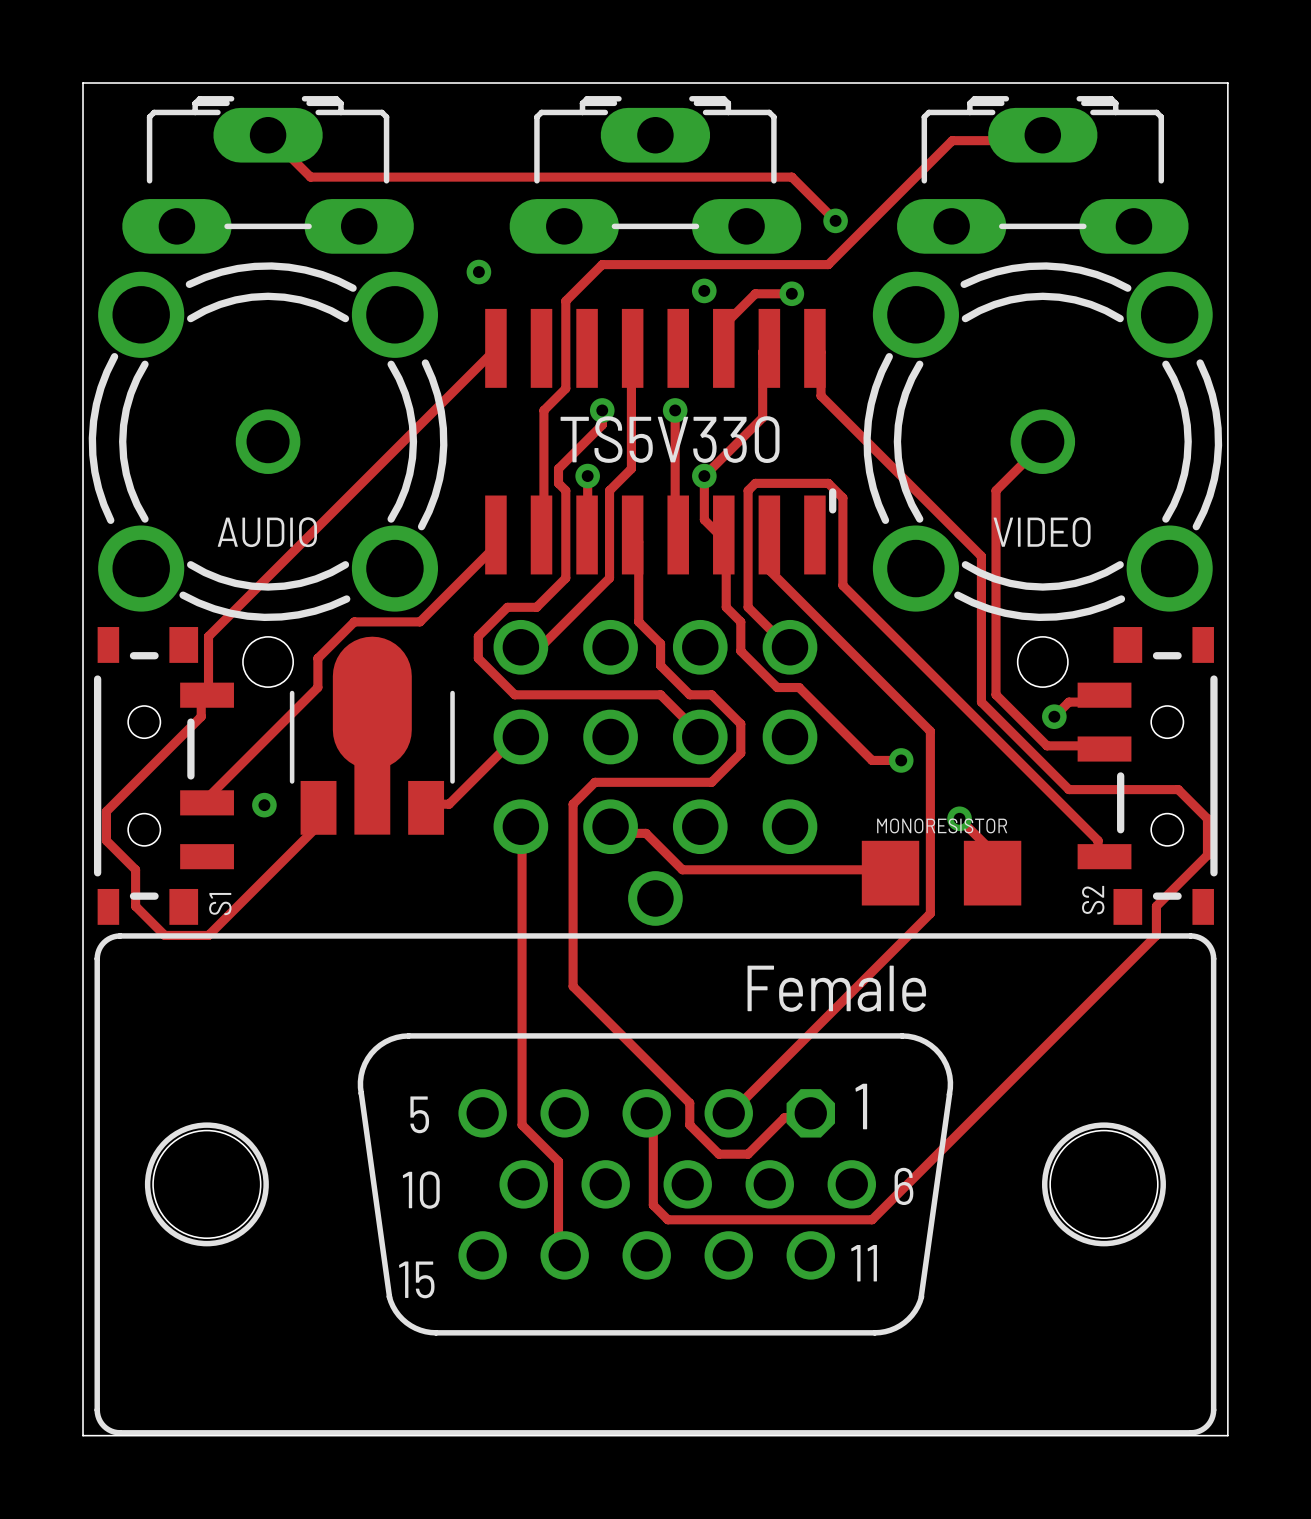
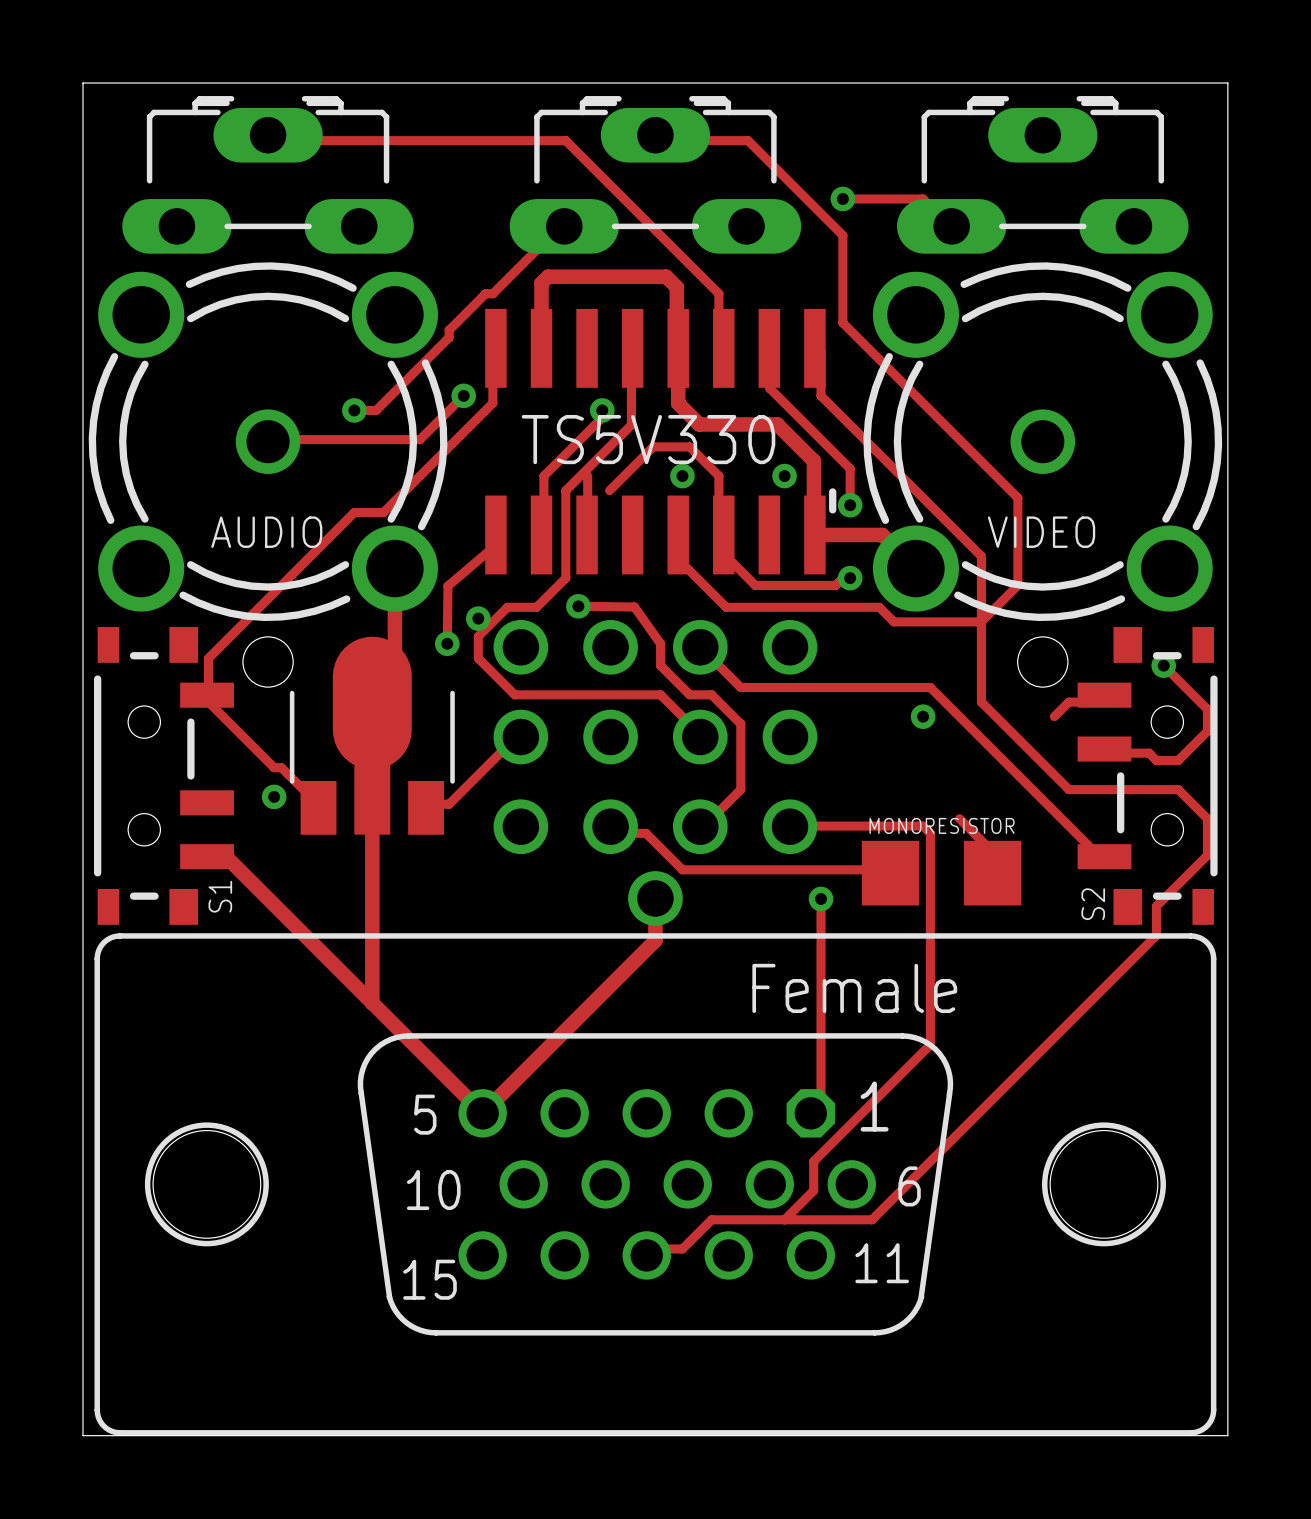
track: (1042, 135) (1039, 140) (952, 140) (828, 264) (602, 264) (565, 301) (565, 388) (543, 410) (543, 476) -> (602, 417) (543, 476)
track: (274, 140) (310, 177) (791, 177) (835, 220) -> (274, 140) (565, 140) (718, 293) (718, 344) (723, 348)
track: none -> (842, 198) (923, 198) (951, 226)
via position: (835, 220) -> (842, 198)
track: none -> (564, 226) (558, 228) (492, 293) (485, 293) (449, 330) (449, 337) (376, 410) (354, 410)
via: (478, 272) -> none
via: (704, 290) -> none
track: (791, 293) (755, 293) (726, 322) (726, 344) (723, 348) -> none
via: (791, 293) -> none
track: none -> (541, 348) (541, 283) (548, 276) (666, 276) (676, 287) (678, 403) (699, 424) (777, 424) (813, 461) (813, 534) (882, 534) (915, 568)
track: (769, 348) (762, 352) (762, 417) (704, 476) (704, 519) (718, 534) -> (769, 348) (769, 388) (850, 468) (850, 505)
track: (492, 352) (208, 636) (208, 658) -> (492, 352) (492, 403) (383, 512) (354, 512) (208, 658)
track: none -> (463, 395) (419, 439) (274, 439) (268, 441)
via: none -> (463, 395)
via: none -> (354, 410)
track: (602, 410) (602, 425) (558, 468) (558, 483) (565, 490) -> (631, 425) (565, 490)
track: (675, 410) (675, 534) (678, 534) -> (655, 135) (660, 140) (748, 140) (842, 235) (842, 322) (1017, 497) (1017, 585) (981, 621) (893, 621) (879, 607) (726, 607) (682, 563) (682, 541) (678, 534)
via: (675, 410) -> none
track: (631, 425) (631, 468) -> (718, 534) (718, 476) (689, 446) (653, 446) (631, 468)
track: (1042, 441) (996, 490) (996, 694) (1047, 745) (1098, 745) (1104, 749) -> (1163, 665) (1207, 709) (1207, 731) (1178, 760) (1156, 760) (1149, 753) (1105, 753) (1104, 749)
via: (587, 476) -> none
via position: (704, 476) -> (682, 476)
via: none -> (784, 476)
track: (609, 490) (609, 578) (543, 643) (522, 643) -> none
via: none -> (850, 505)
track: (632, 534) (638, 541) (638, 621) (660, 643) -> (578, 606) (634, 607) (660, 643)
track: (769, 534) (769, 570) (930, 731) (930, 833) -> (790, 826) (923, 826) (930, 833)
track: (500, 541) (419, 621) (354, 621) (317, 658) (317, 687) (208, 796) -> (500, 541) (447, 586) (447, 643)
track: (726, 556) (726, 607) (740, 621) (740, 651) (777, 687) -> (700, 647) (740, 687) (777, 687)
track: none -> (726, 556) (755, 585) (835, 585) (842, 578) (850, 578)
track: none -> (394, 568) (394, 680) (372, 703) (372, 1003)
via: none -> (850, 578)
via: none -> (578, 606)
via: none -> (478, 618)
via: none -> (447, 643)
track: (790, 647) (748, 607) (748, 490) (755, 483) (828, 483) (842, 497) (842, 585) (1098, 840) (1098, 855) -> (799, 687) (930, 687) (1098, 855)
via: none -> (1163, 665)
track: (799, 687) (872, 760) (901, 760) -> none
track: (207, 695) (201, 702) (201, 716) (106, 811) (106, 840) (135, 869) (135, 906) (164, 935) (208, 935) (317, 826) (318, 807) -> (207, 695) (208, 702) (274, 767) (281, 767) (317, 804) (318, 807)
via: (1054, 716) -> none
track: (740, 753) (711, 782) (594, 782) (573, 804) (573, 986) (689, 1103) (689, 1125) (718, 1154) (748, 1154) (784, 1117) (806, 1117) (810, 1113) -> (821, 898) (821, 1103) (810, 1113)
track: none -> (740, 753) (740, 789) (704, 826) (700, 826)
via position: (901, 760) -> (923, 716)
via position: (264, 805) -> (274, 796)
via: (959, 818) -> none
track: (520, 826) (522, 1125) (558, 1161) (558, 1248) (564, 1255) -> none
track: none -> (207, 856) (225, 856) (482, 1113) (655, 940) (655, 898)
via: none -> (821, 898)
track: (930, 913) (728, 1113) -> (930, 913) (930, 1044) (813, 1161) (813, 1190) (784, 1219)
track: (646, 1113) (653, 1117) (653, 1205) (667, 1219) (711, 1219) -> (646, 1255) (653, 1248) (682, 1248) (711, 1219)

